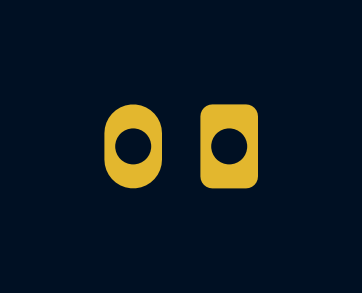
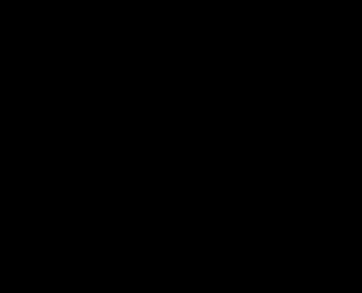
part: (181, 146) -> none

